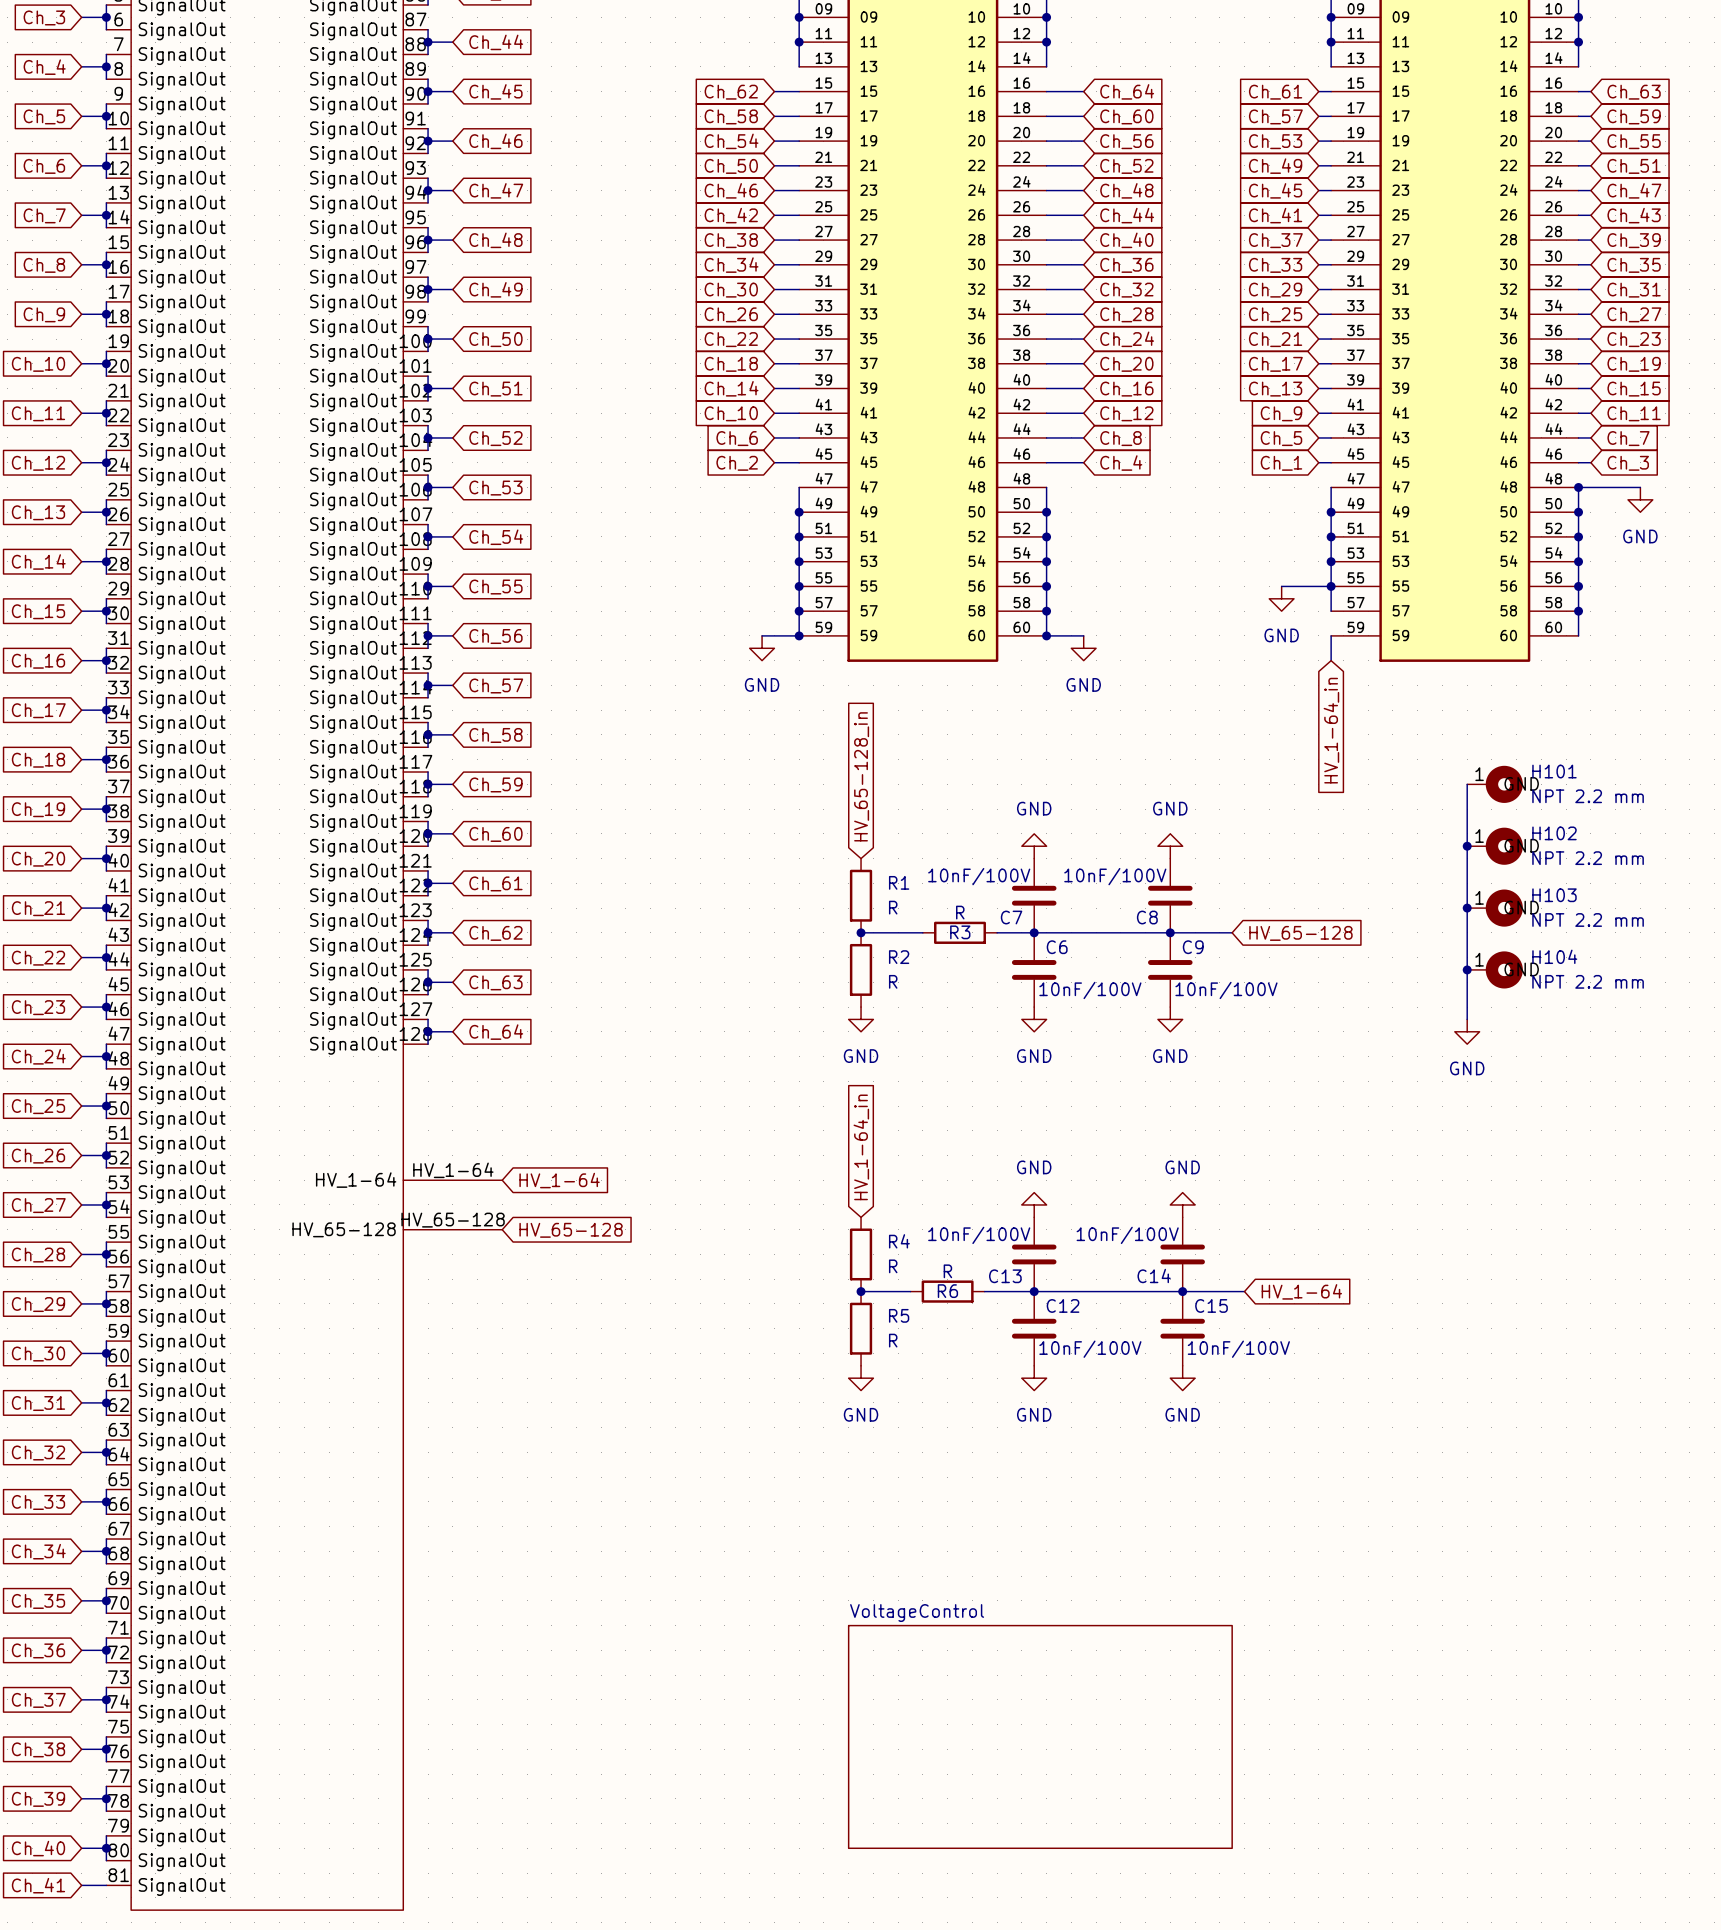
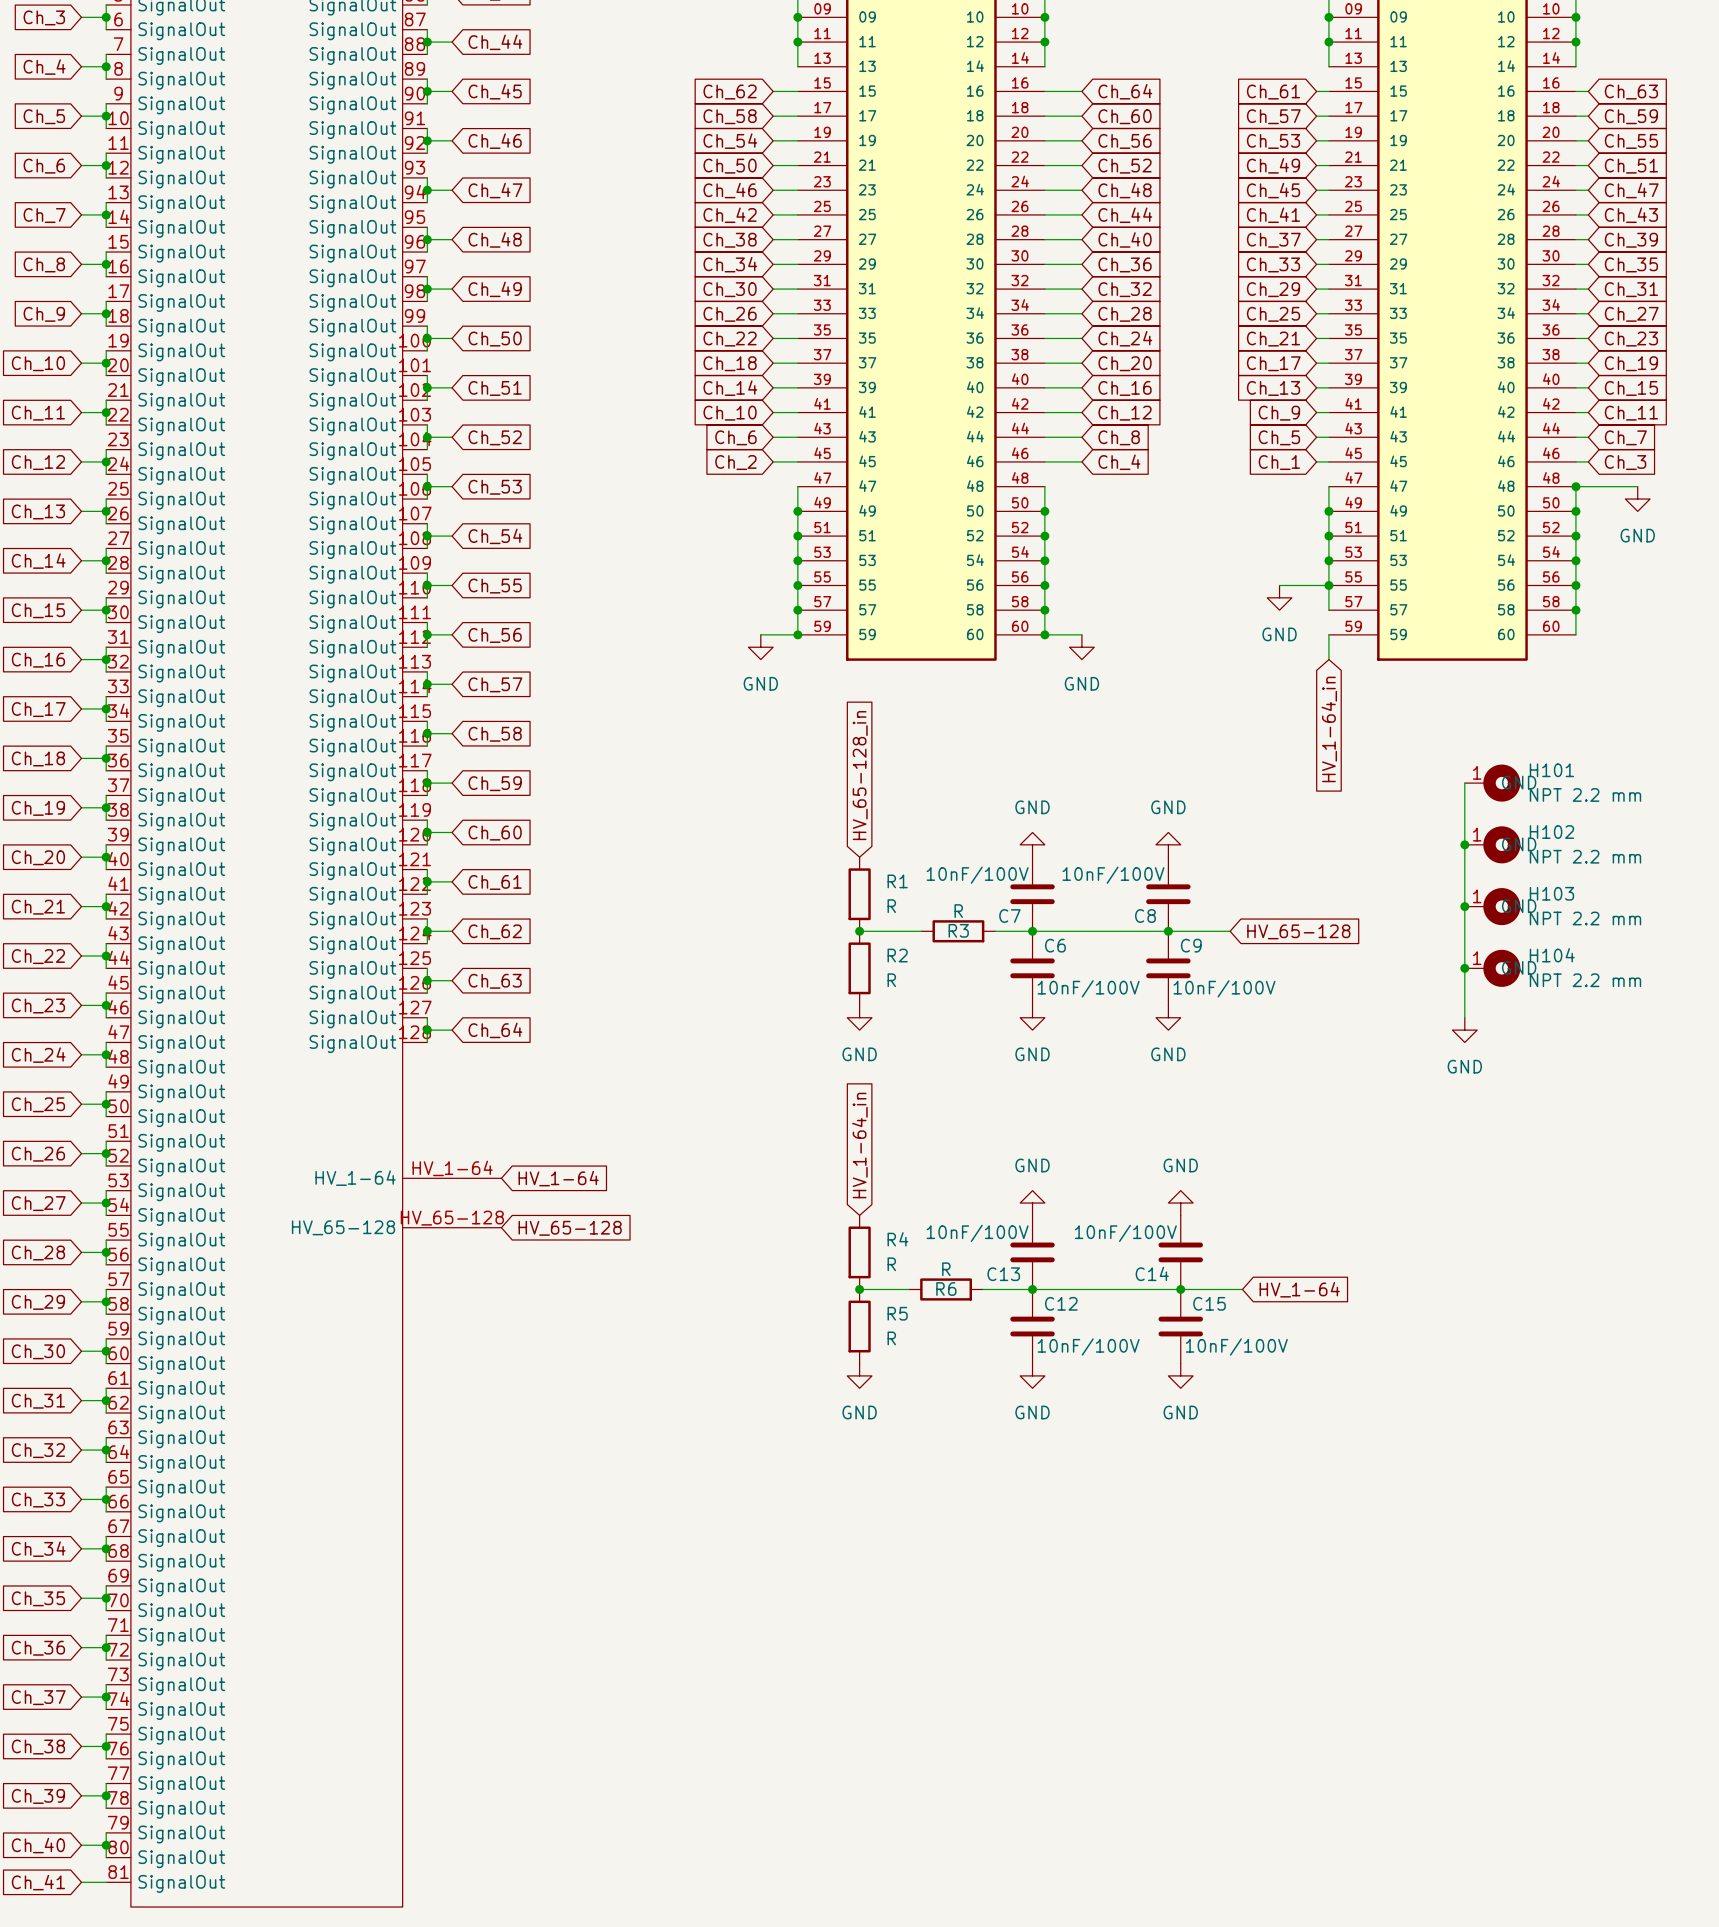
sheet VoltageControl: (1040, 1736) -> none

